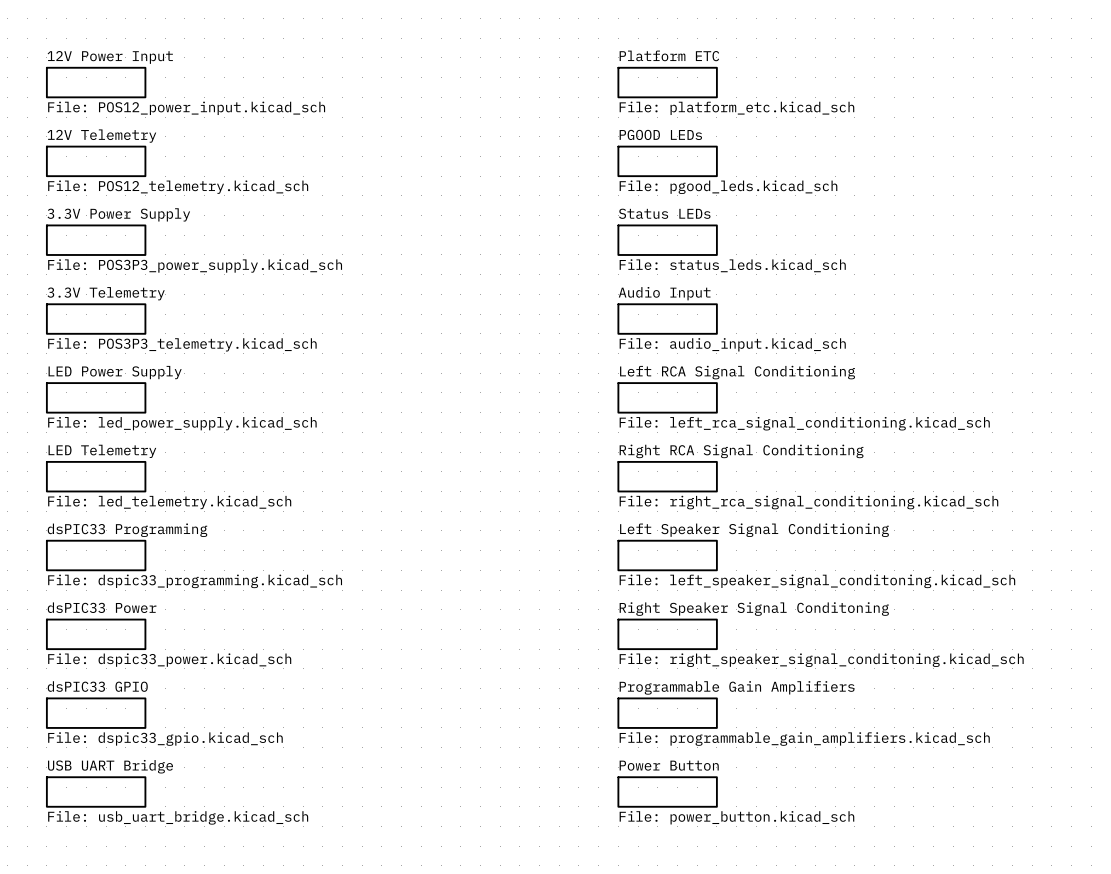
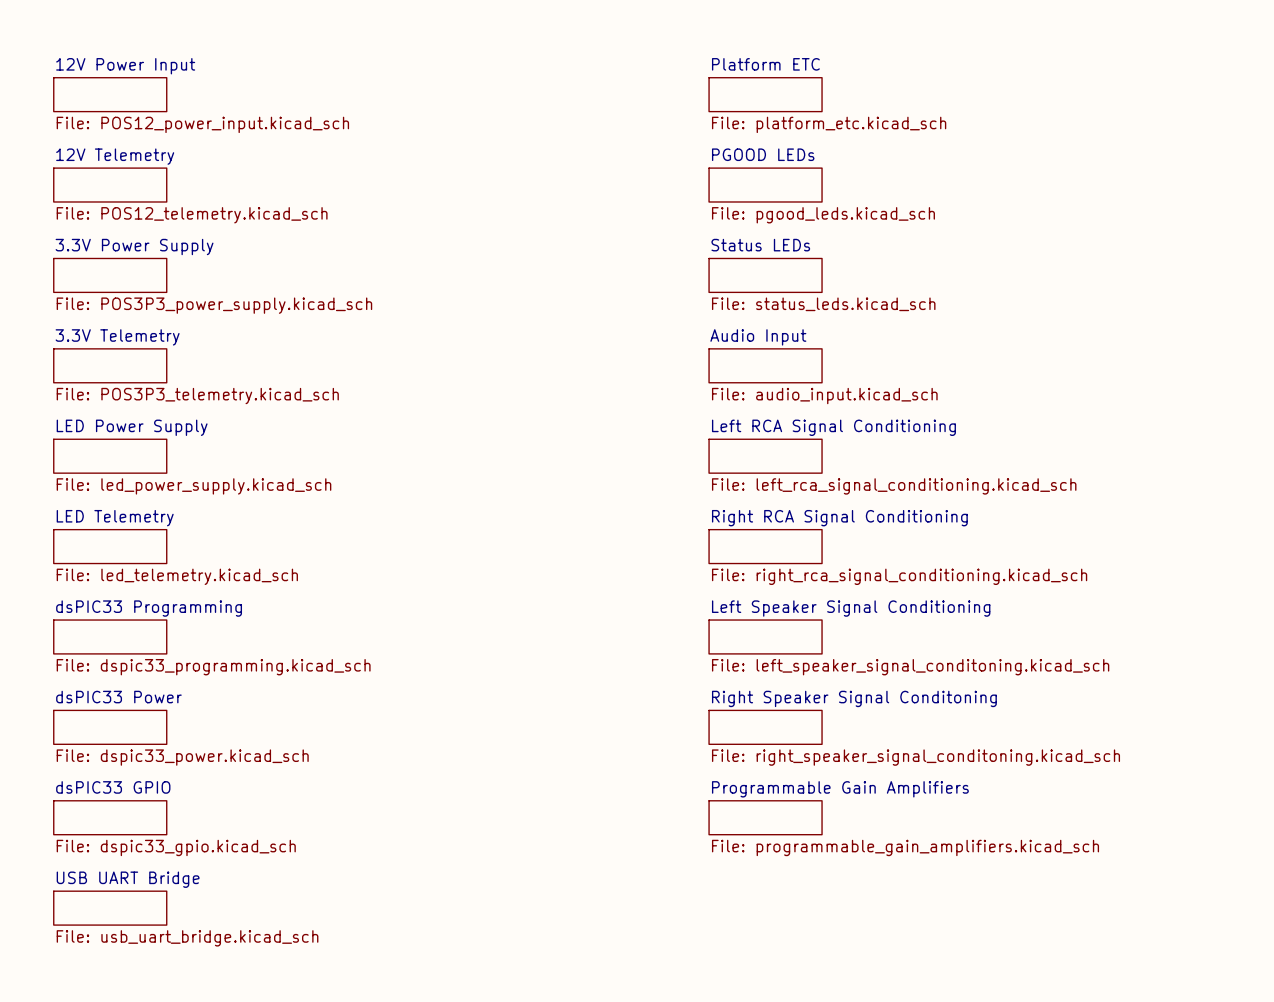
sheet Power Button: File: power_button.kicad_sch (667, 792) -> none

